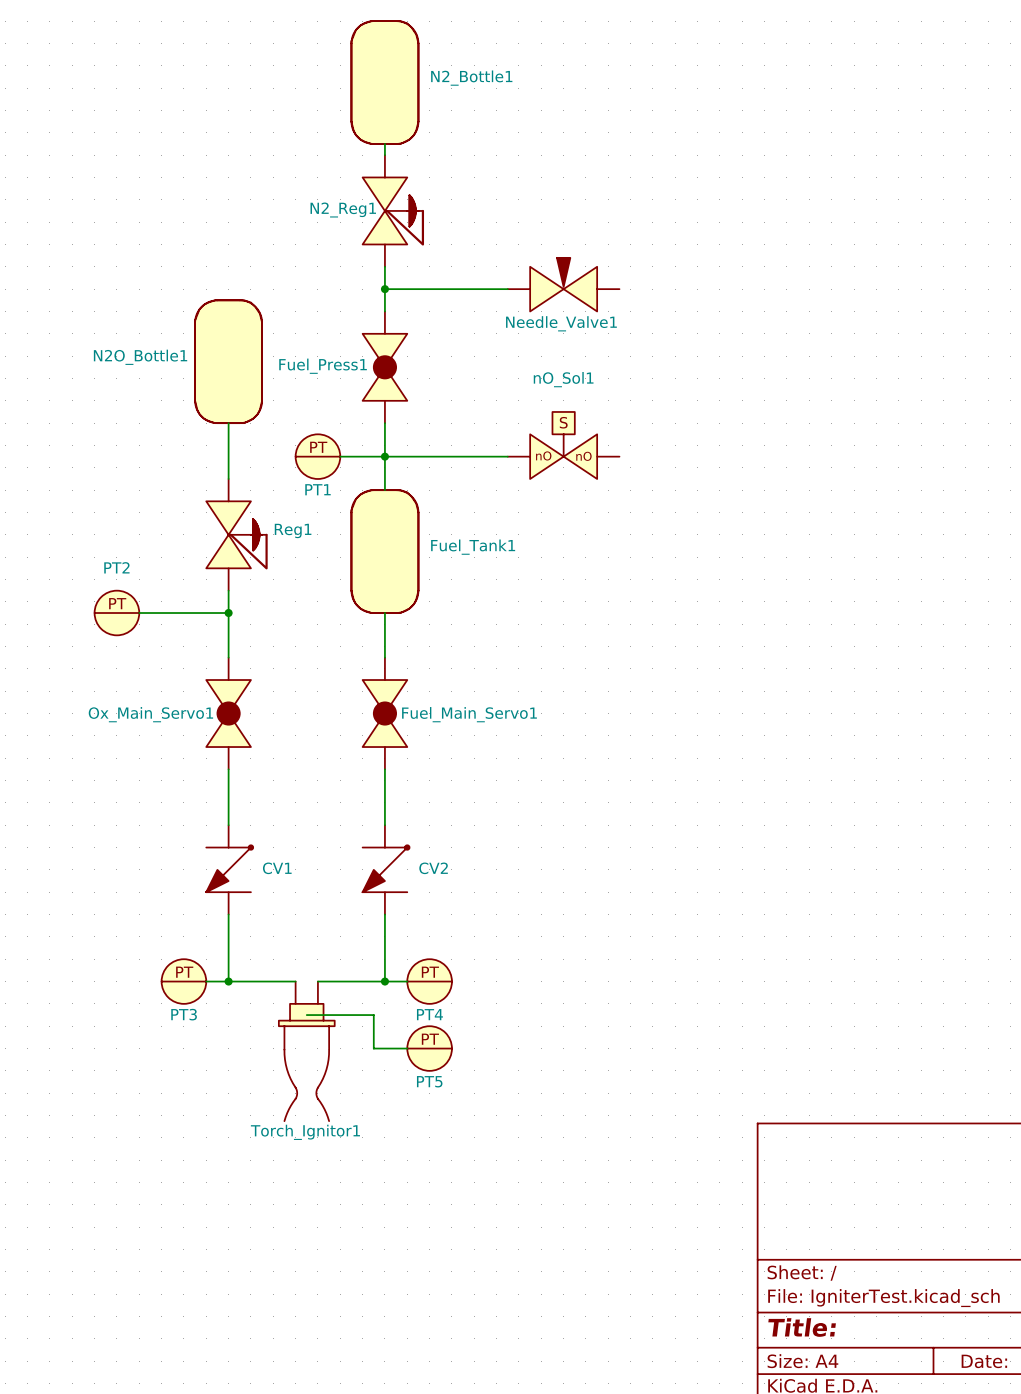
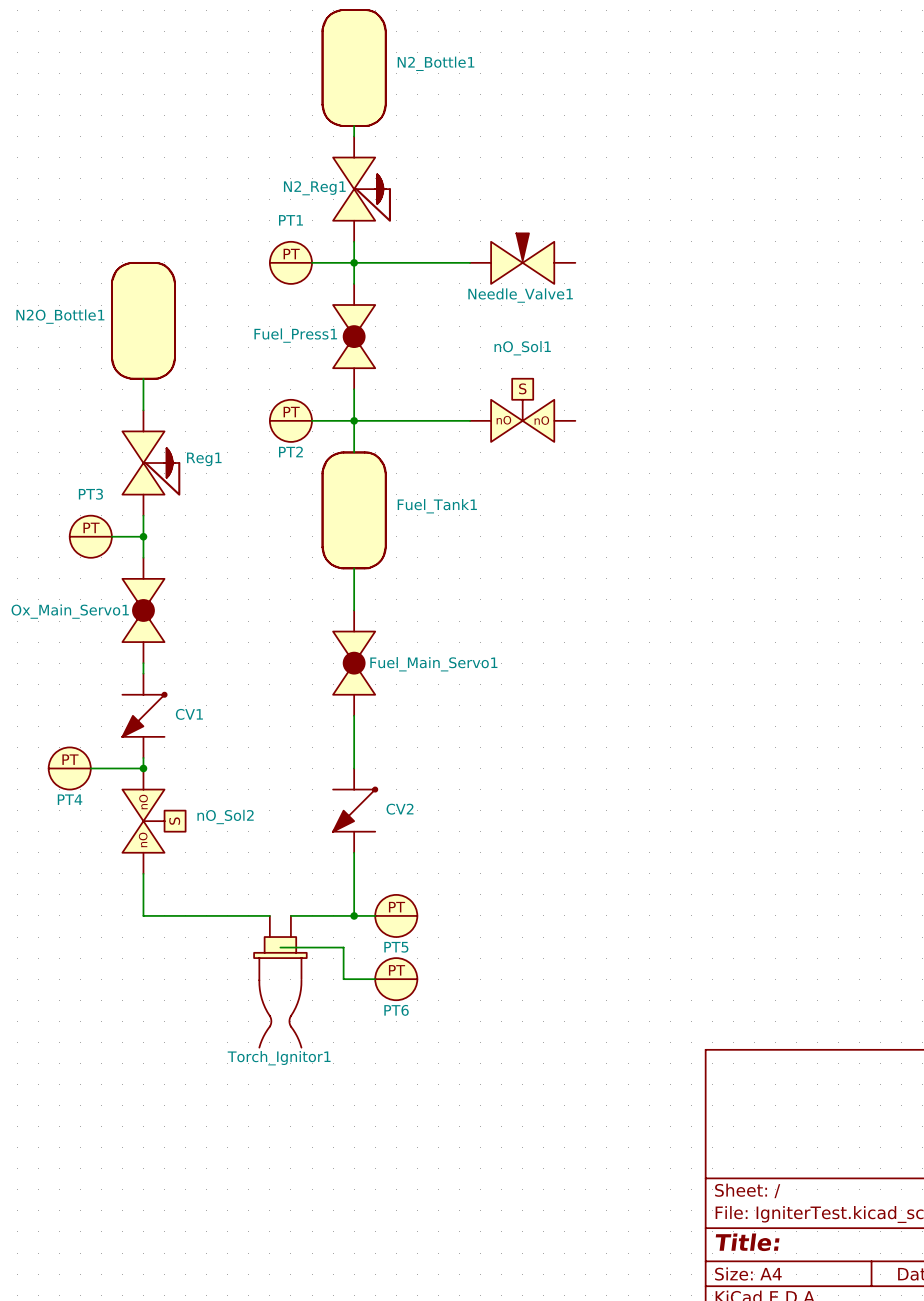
PT1: none -> (290, 262)
wire: none -> (312, 262) (354, 262)
N2O_Bottle1 position: (228, 361) -> (143, 320)
wire: none -> (143, 378) (143, 410)
wire: (228, 423) (228, 478) -> none
PT1 name: PT1 (317, 489) -> PT2 (290, 451)
Reg1 position: (236, 534) -> (151, 463)
wire: none -> (143, 515) (143, 557)
wire: none -> (111, 536) (143, 536)
junction: none -> (143, 536)
wire: (228, 590) (228, 657) -> none
PT2: (116, 613) -> none
wire: (139, 613) (228, 613) -> none
junction: (228, 613) -> none
wire: none -> (143, 663) (143, 673)
Ox_Main_Servo1 position: (228, 713) -> (143, 610)
wire: (228, 769) (228, 825) -> none
wire: none -> (143, 757) (143, 768) (90, 768)
PT4: none -> (69, 768)
junction: none -> (143, 768)
CV1 position: (229, 869) -> (144, 715)
nO_Sol2: none -> (154, 821)
wire: (228, 914) (228, 981) -> none
wire: none -> (143, 873) (143, 915) (185, 915)
PT3 position: (183, 981) -> (90, 536)
junction: (228, 981) -> none
PT3 name position: PT3 (184, 1014) -> PT3 (90, 494)
PT4 name: PT4 (429, 1014) -> PT5 (396, 947)
PT5 name: PT5 (429, 1081) -> PT6 (396, 1010)

